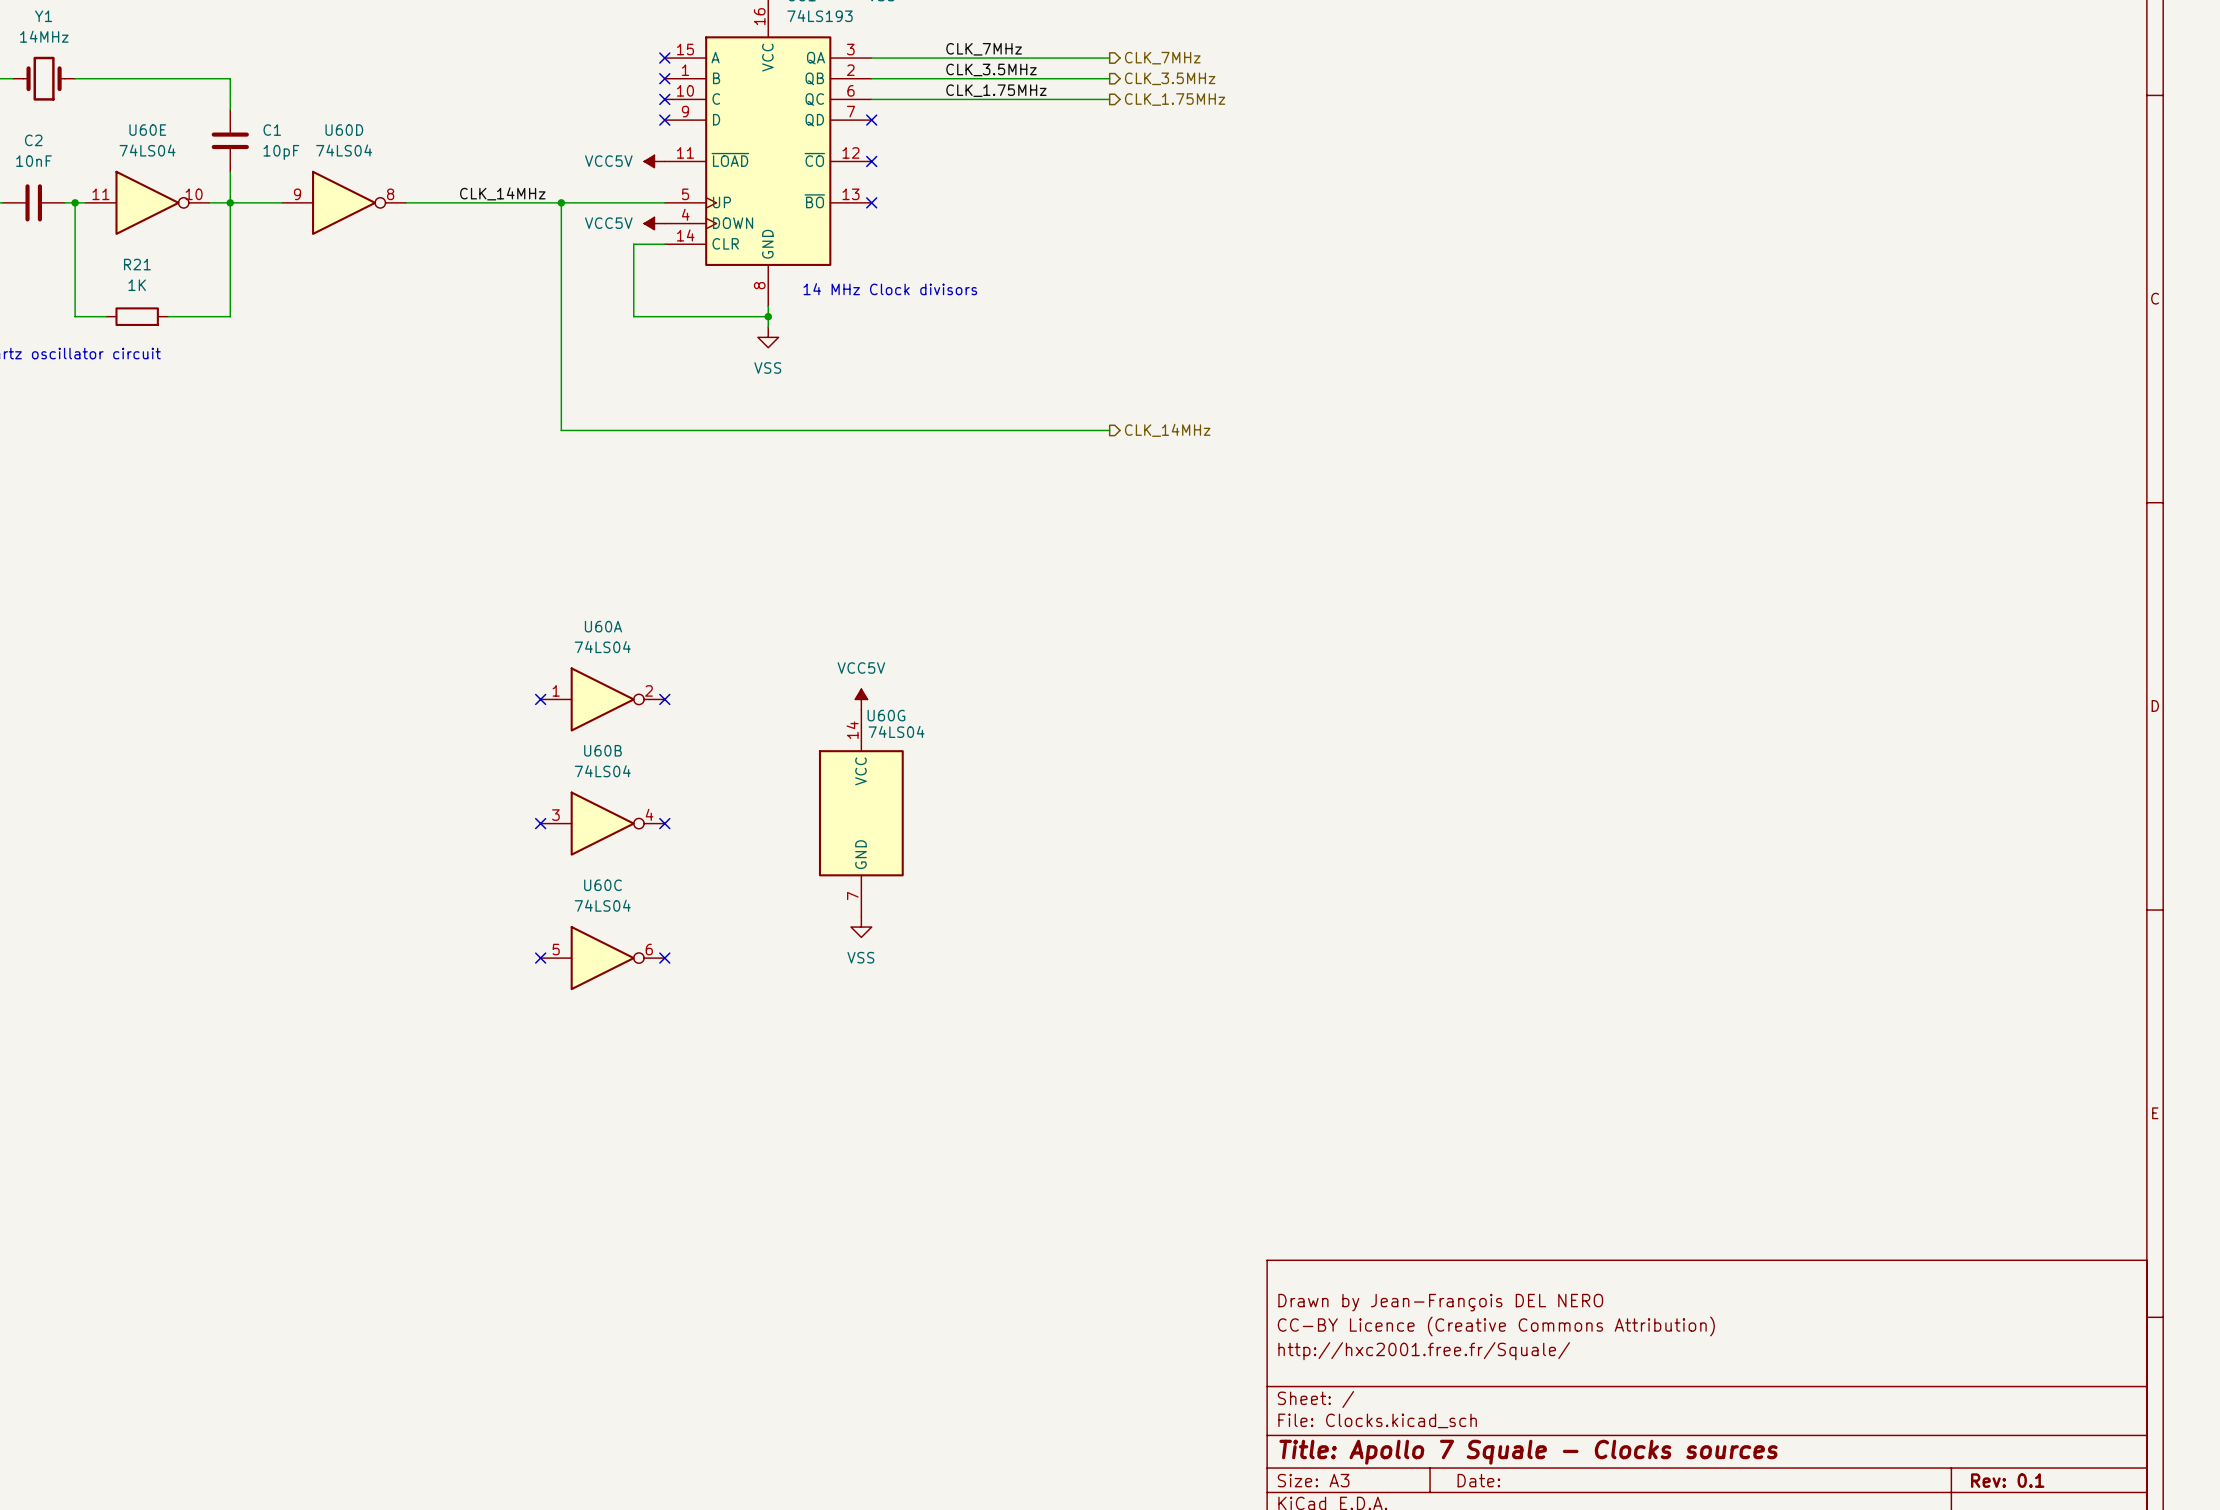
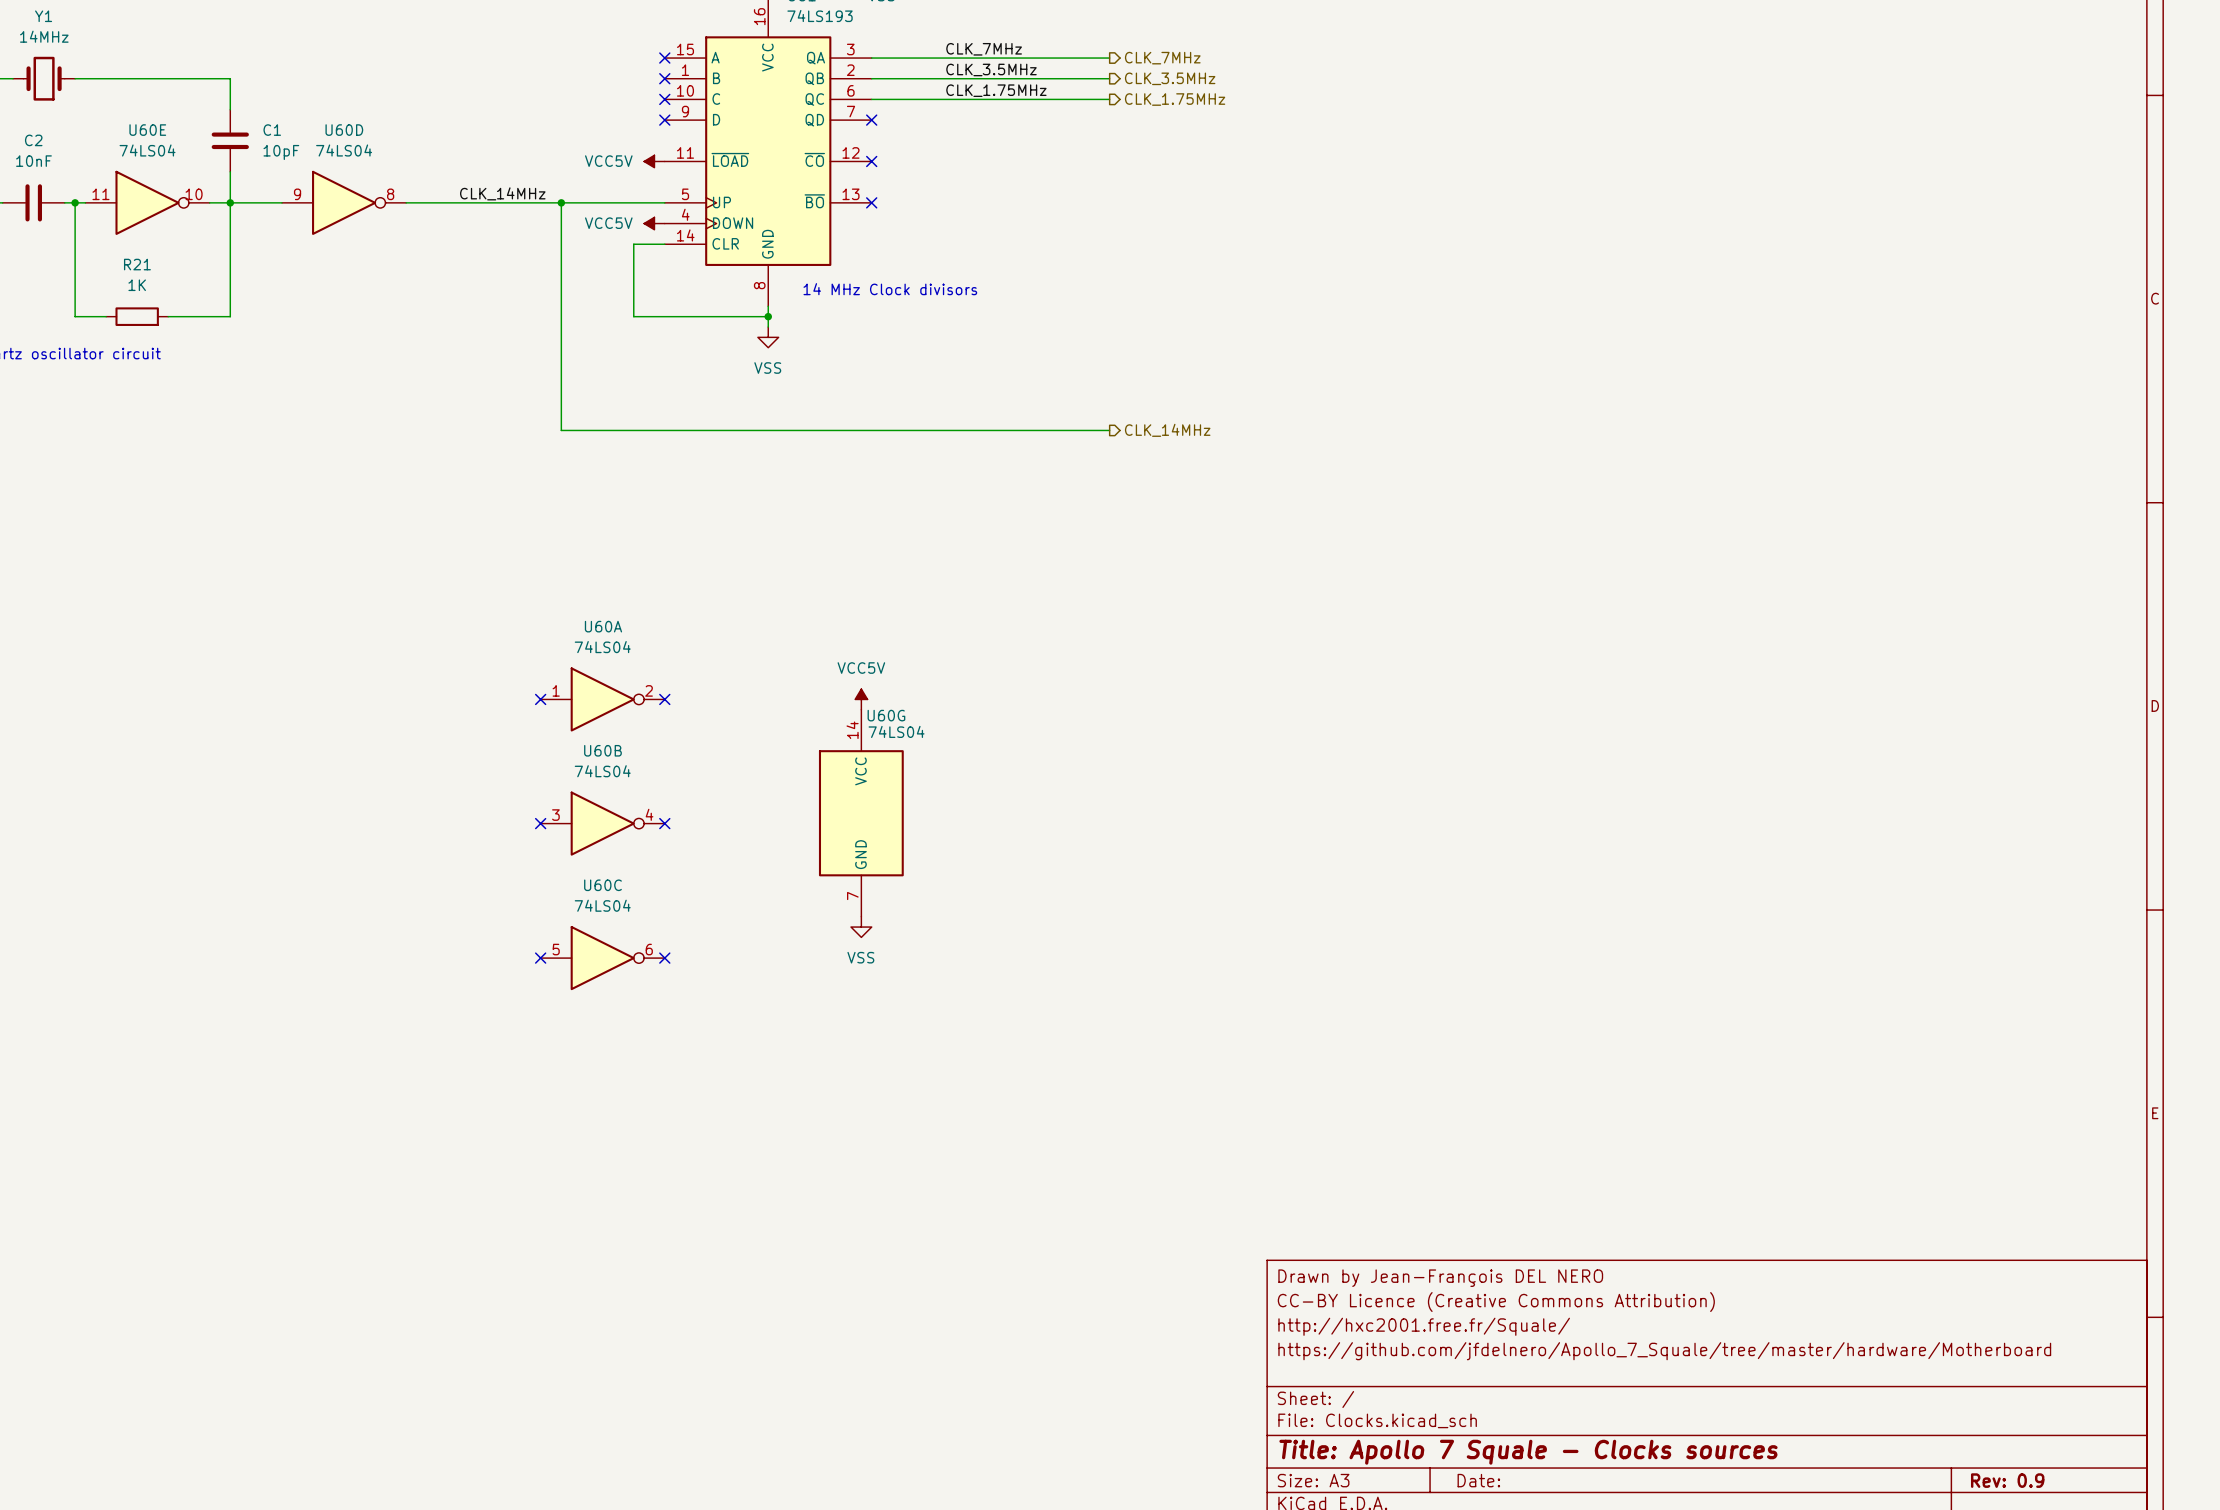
title block: none -> Drawn by Jean-François DEL NERO (1440, 1278)
title block: Drawn by Jean-François DEL NERO (1440, 1302) -> CC-BY Licence (Creative Commons Attribution) (1496, 1302)
title block: CC-BY Licence (Creative Commons Attribution) (1496, 1326) -> http://hxc2001.free.fr/Squale/ (1424, 1326)
title block: http://hxc2001.free.fr/Squale/ (1424, 1351) -> https://github.com/jfdelnero/Apollo_7_Squale/tree/master/hardware/Motherboard (1664, 1351)
title block: Rev: 0.1 (2007, 1480) -> Rev: 0.9 (2007, 1480)

